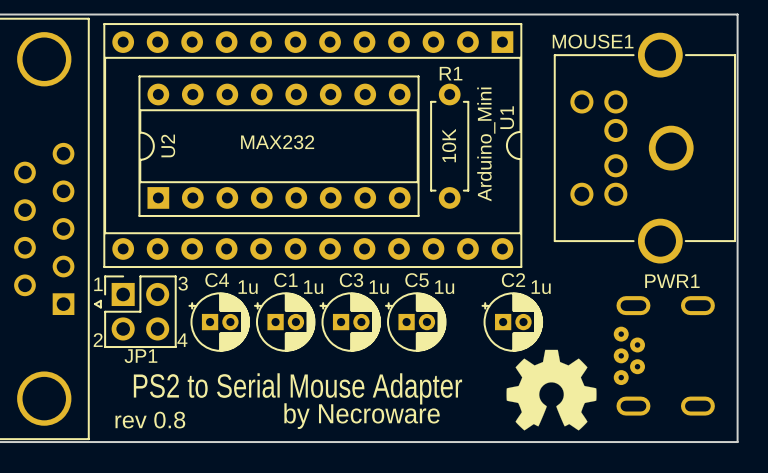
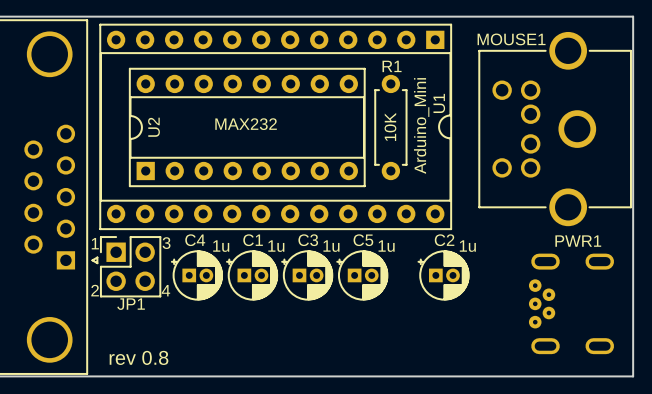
drawing: [506, 349, 597, 431] -> none
text: PS2 to Serial Mouse Adapter (297, 388) -> none
text: by Necroware (362, 416) -> none

